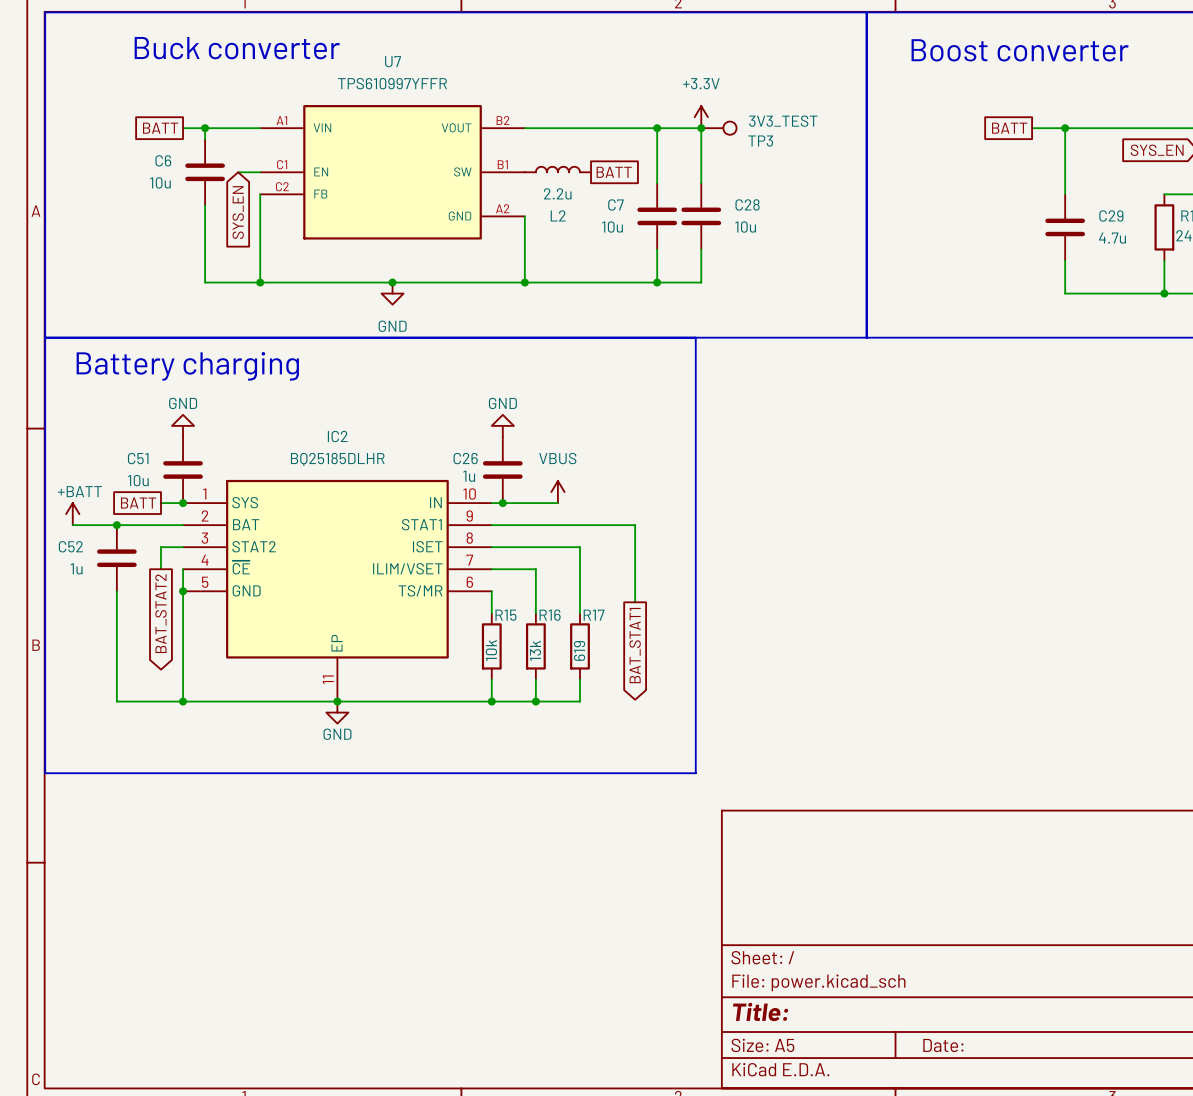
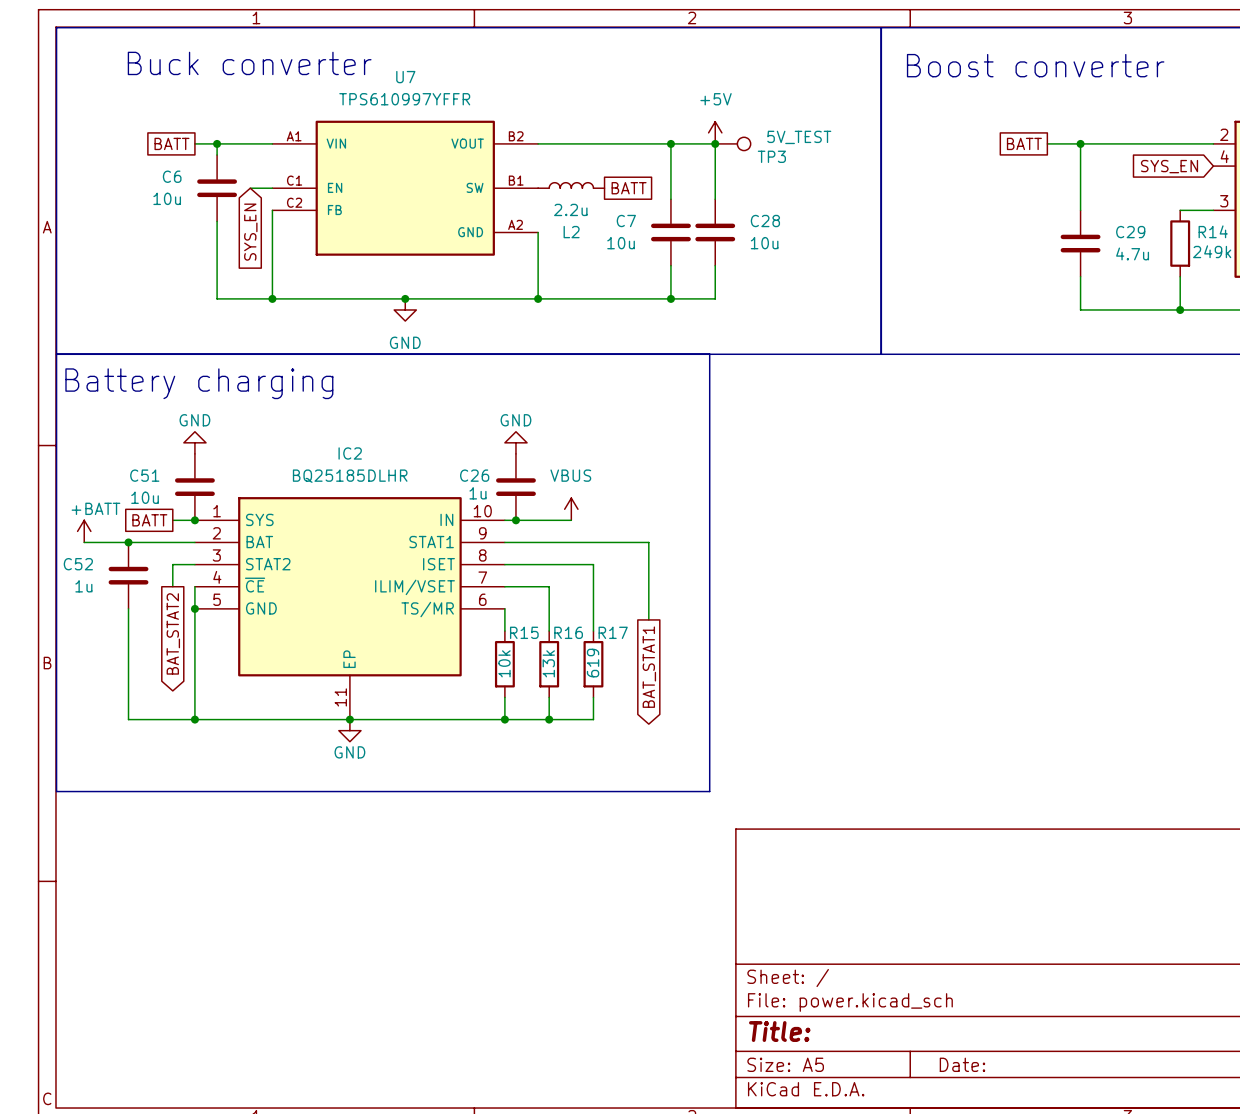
power symbol: +3.3V (701, 117) -> +5V (715, 132)
TP3 value: 3V3_TEST (783, 121) -> 5V_TEST (799, 137)

